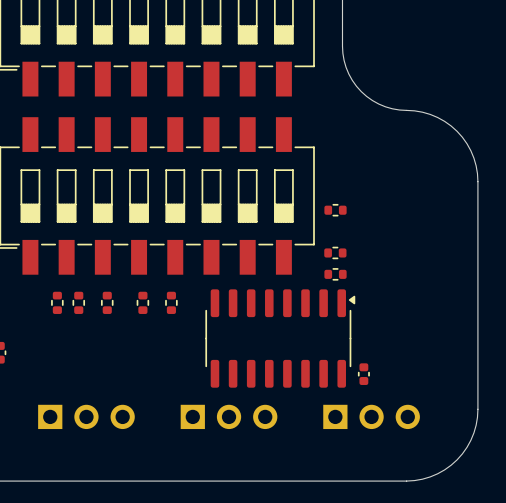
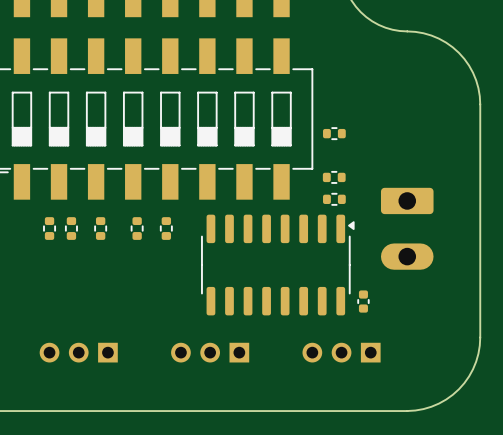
part: none -> (407, 228)
part footprint: [38, 404, 135, 430] -> [39, 342, 118, 363]
part: (229, 416) -> none
part: (371, 416) -> none
part: none -> (210, 352)
part: none -> (341, 352)

